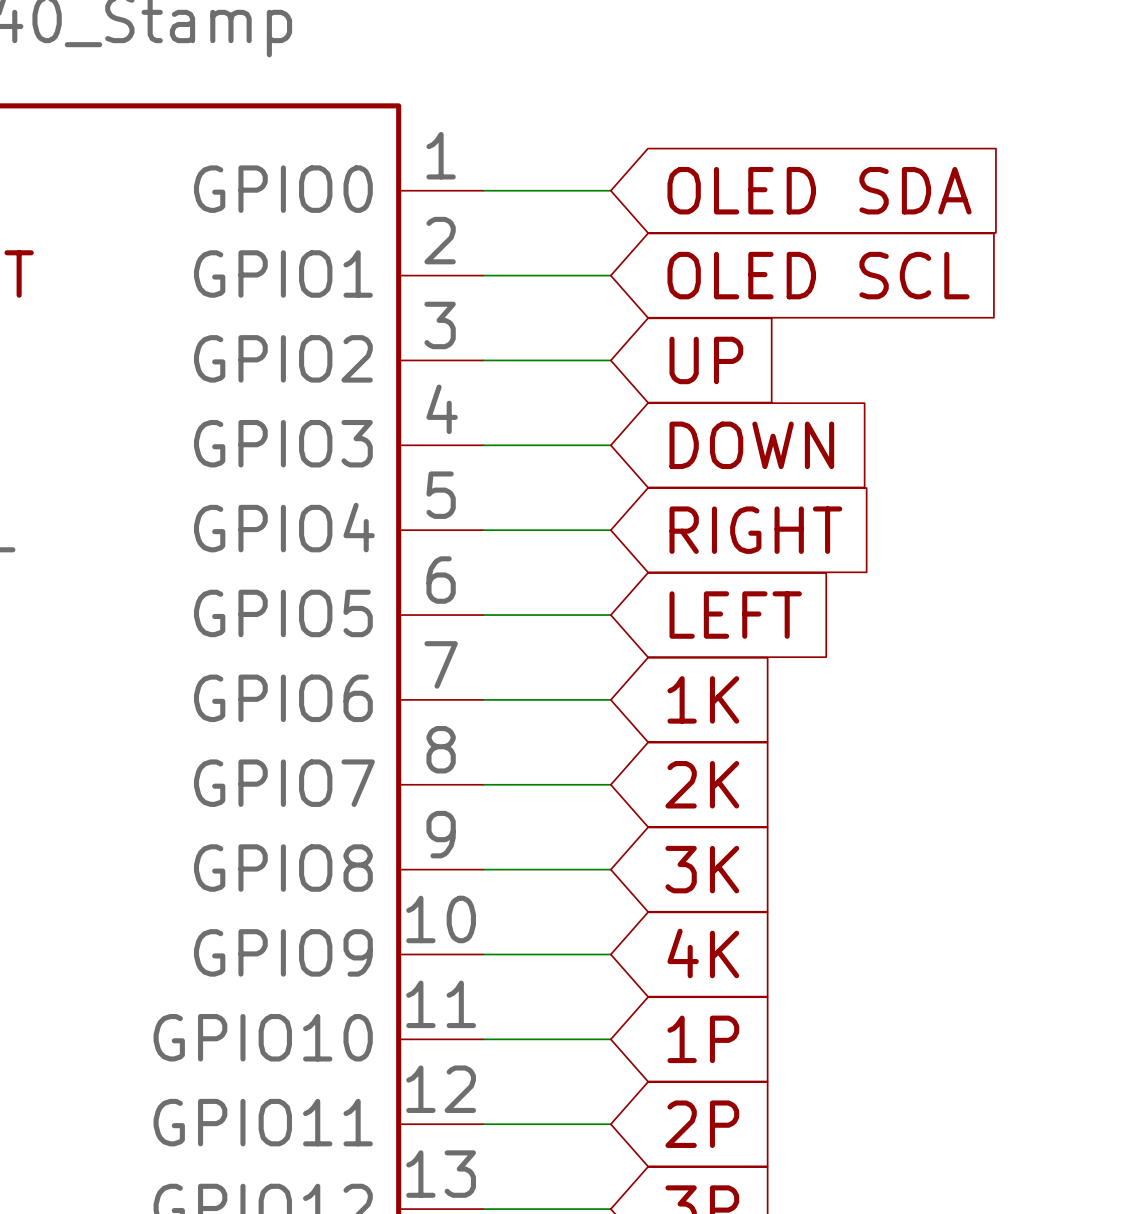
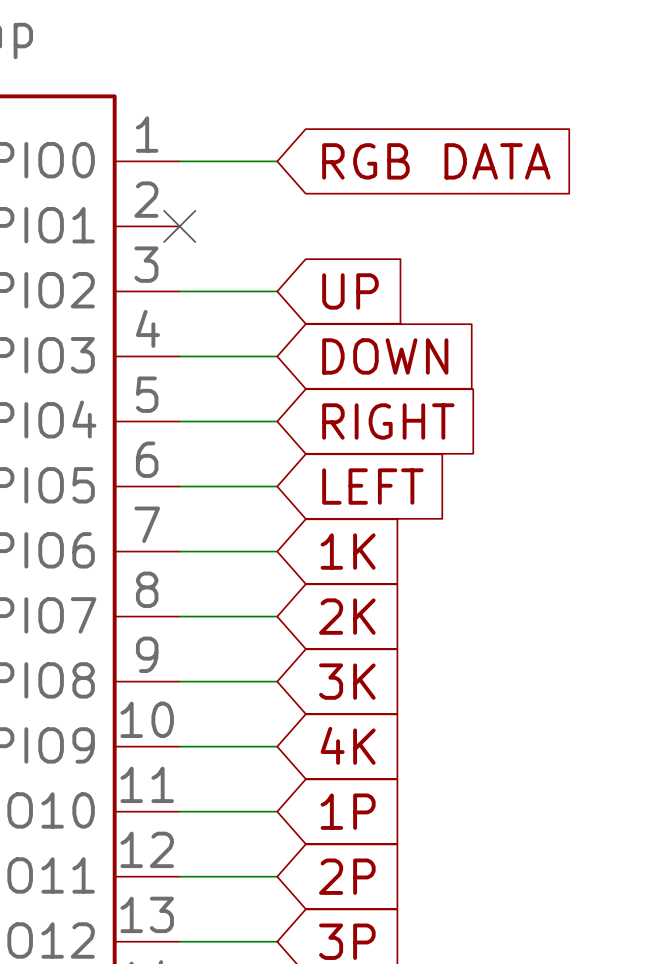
global label: OLED SDA (819, 190) -> RGB DATA (436, 161)
wire: (483, 275) (610, 275) -> none
no-connect mark: none -> (179, 226)
global label: OLED SCL (818, 275) -> none

